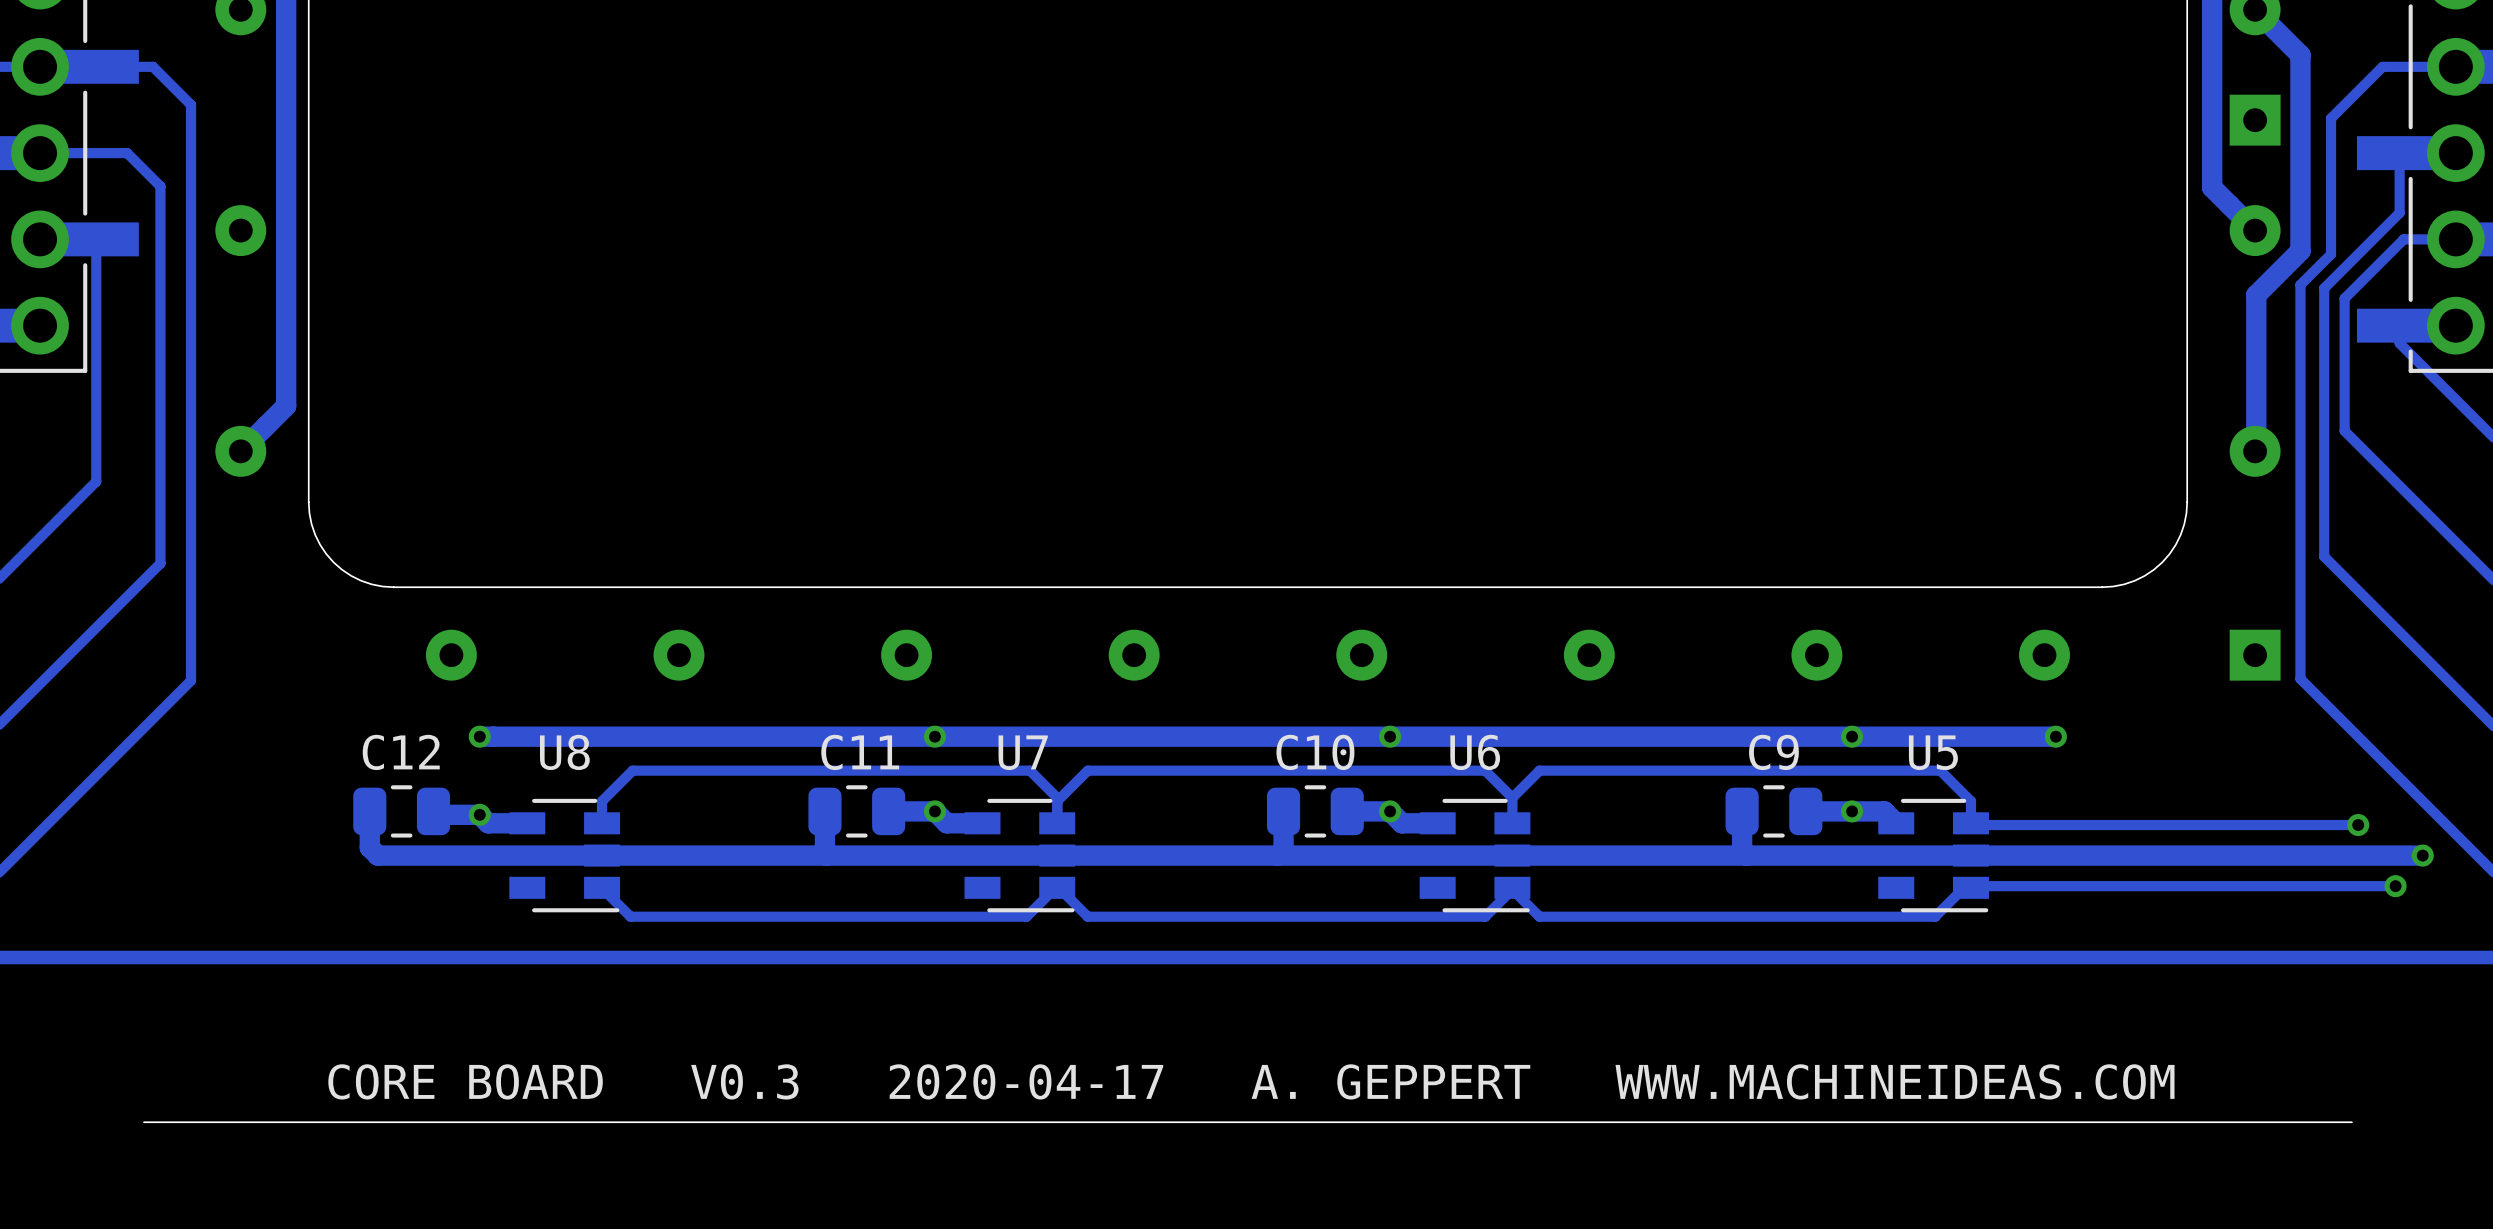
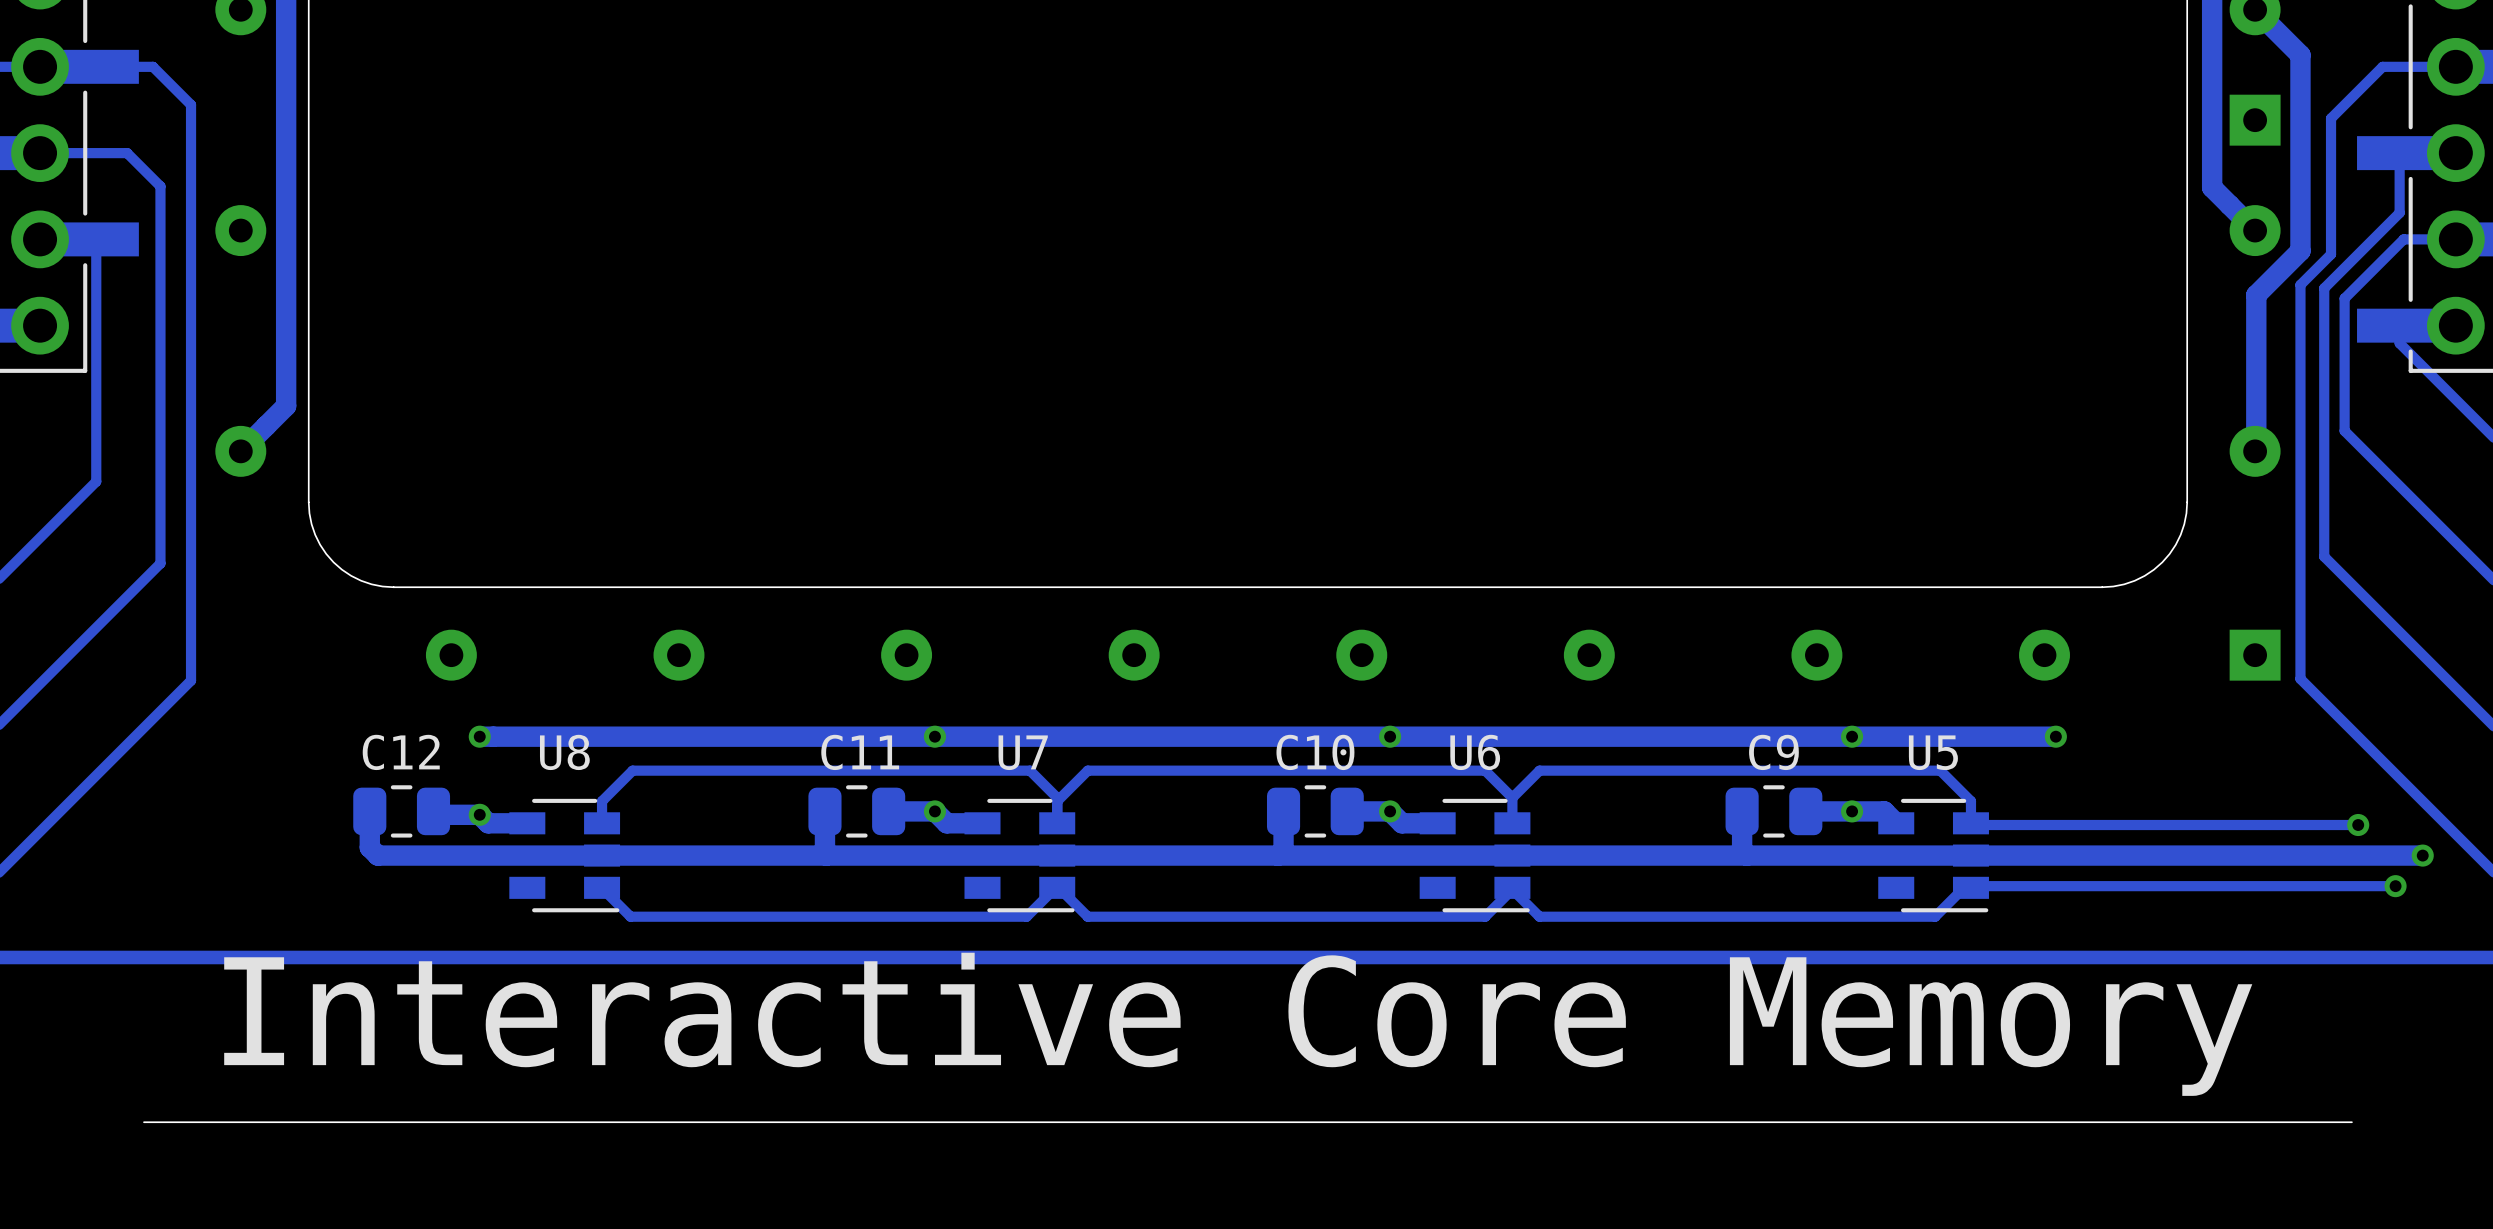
text: none -> Interactive Core Memory (1238, 1024)
text: CORE BOARD V0.3 2020-04-17 A. GEPPERT WWW.MACHINEIDEAS.COM (1251, 1081) -> none

